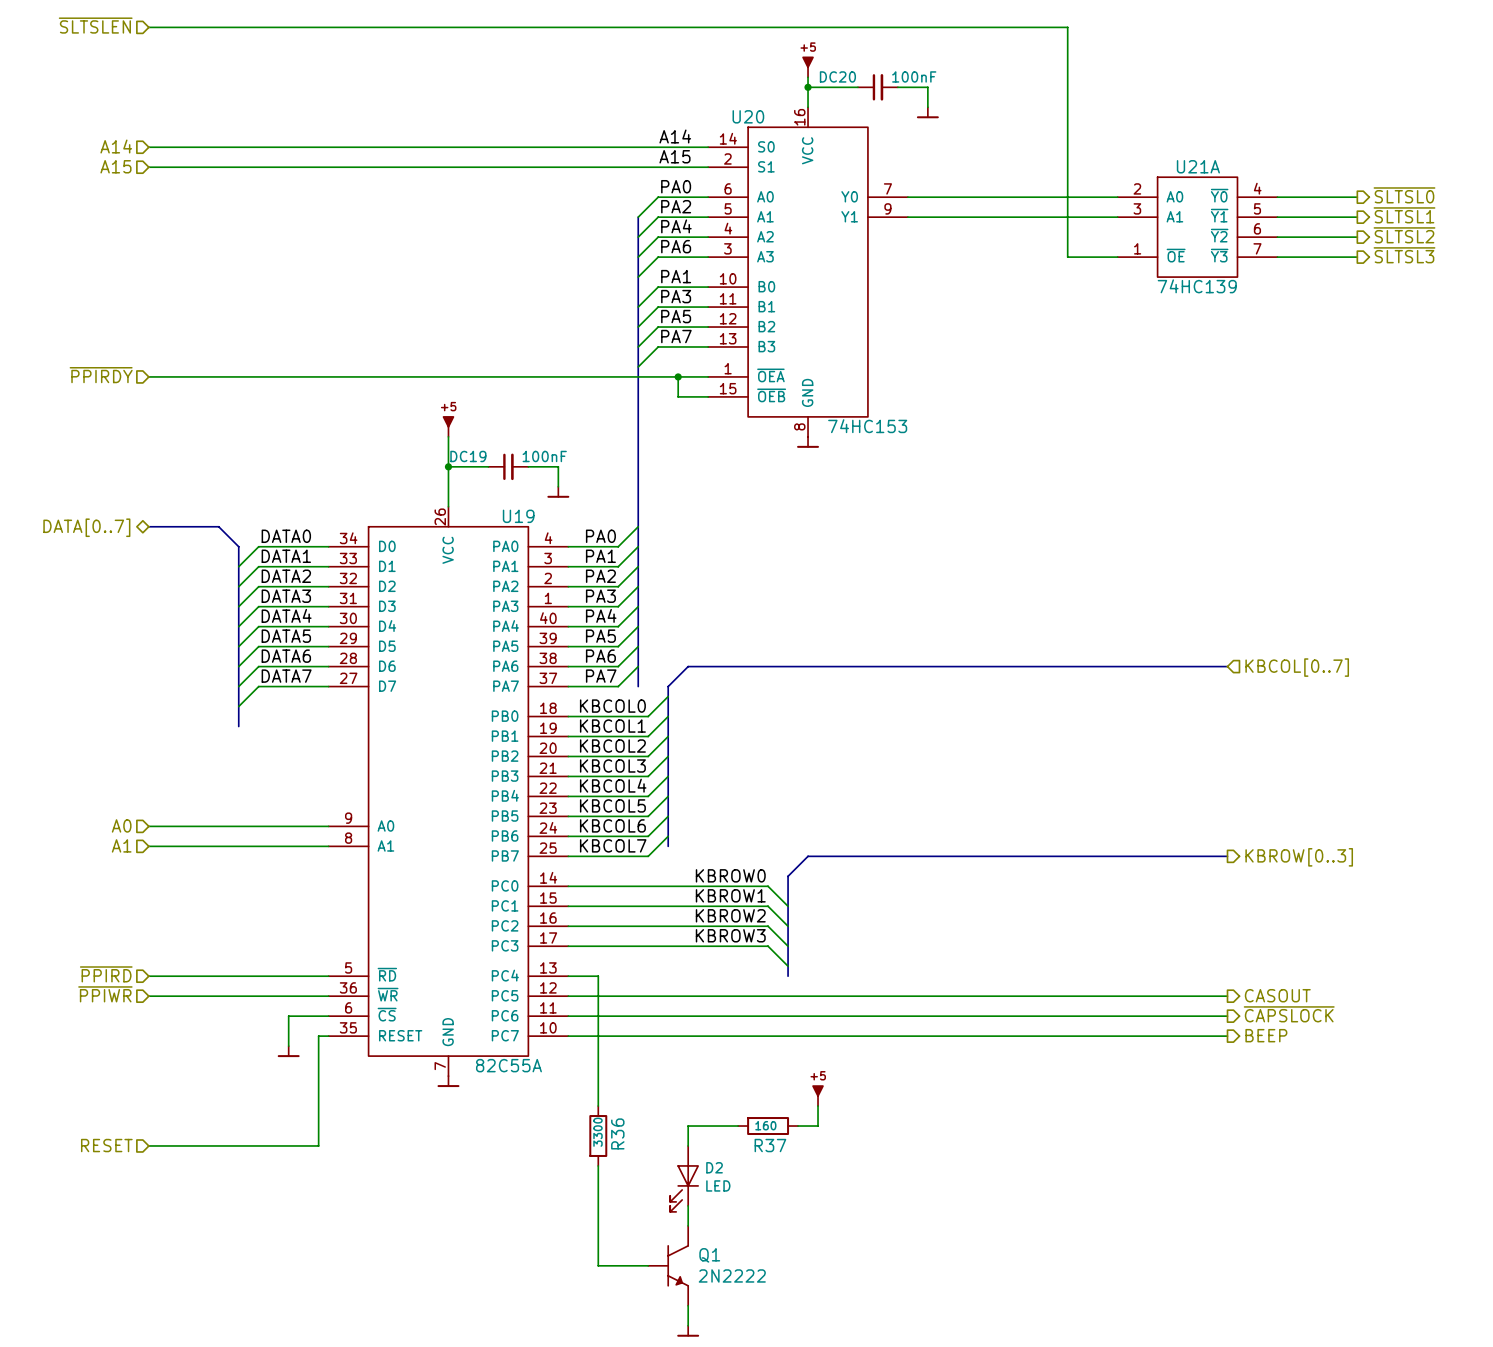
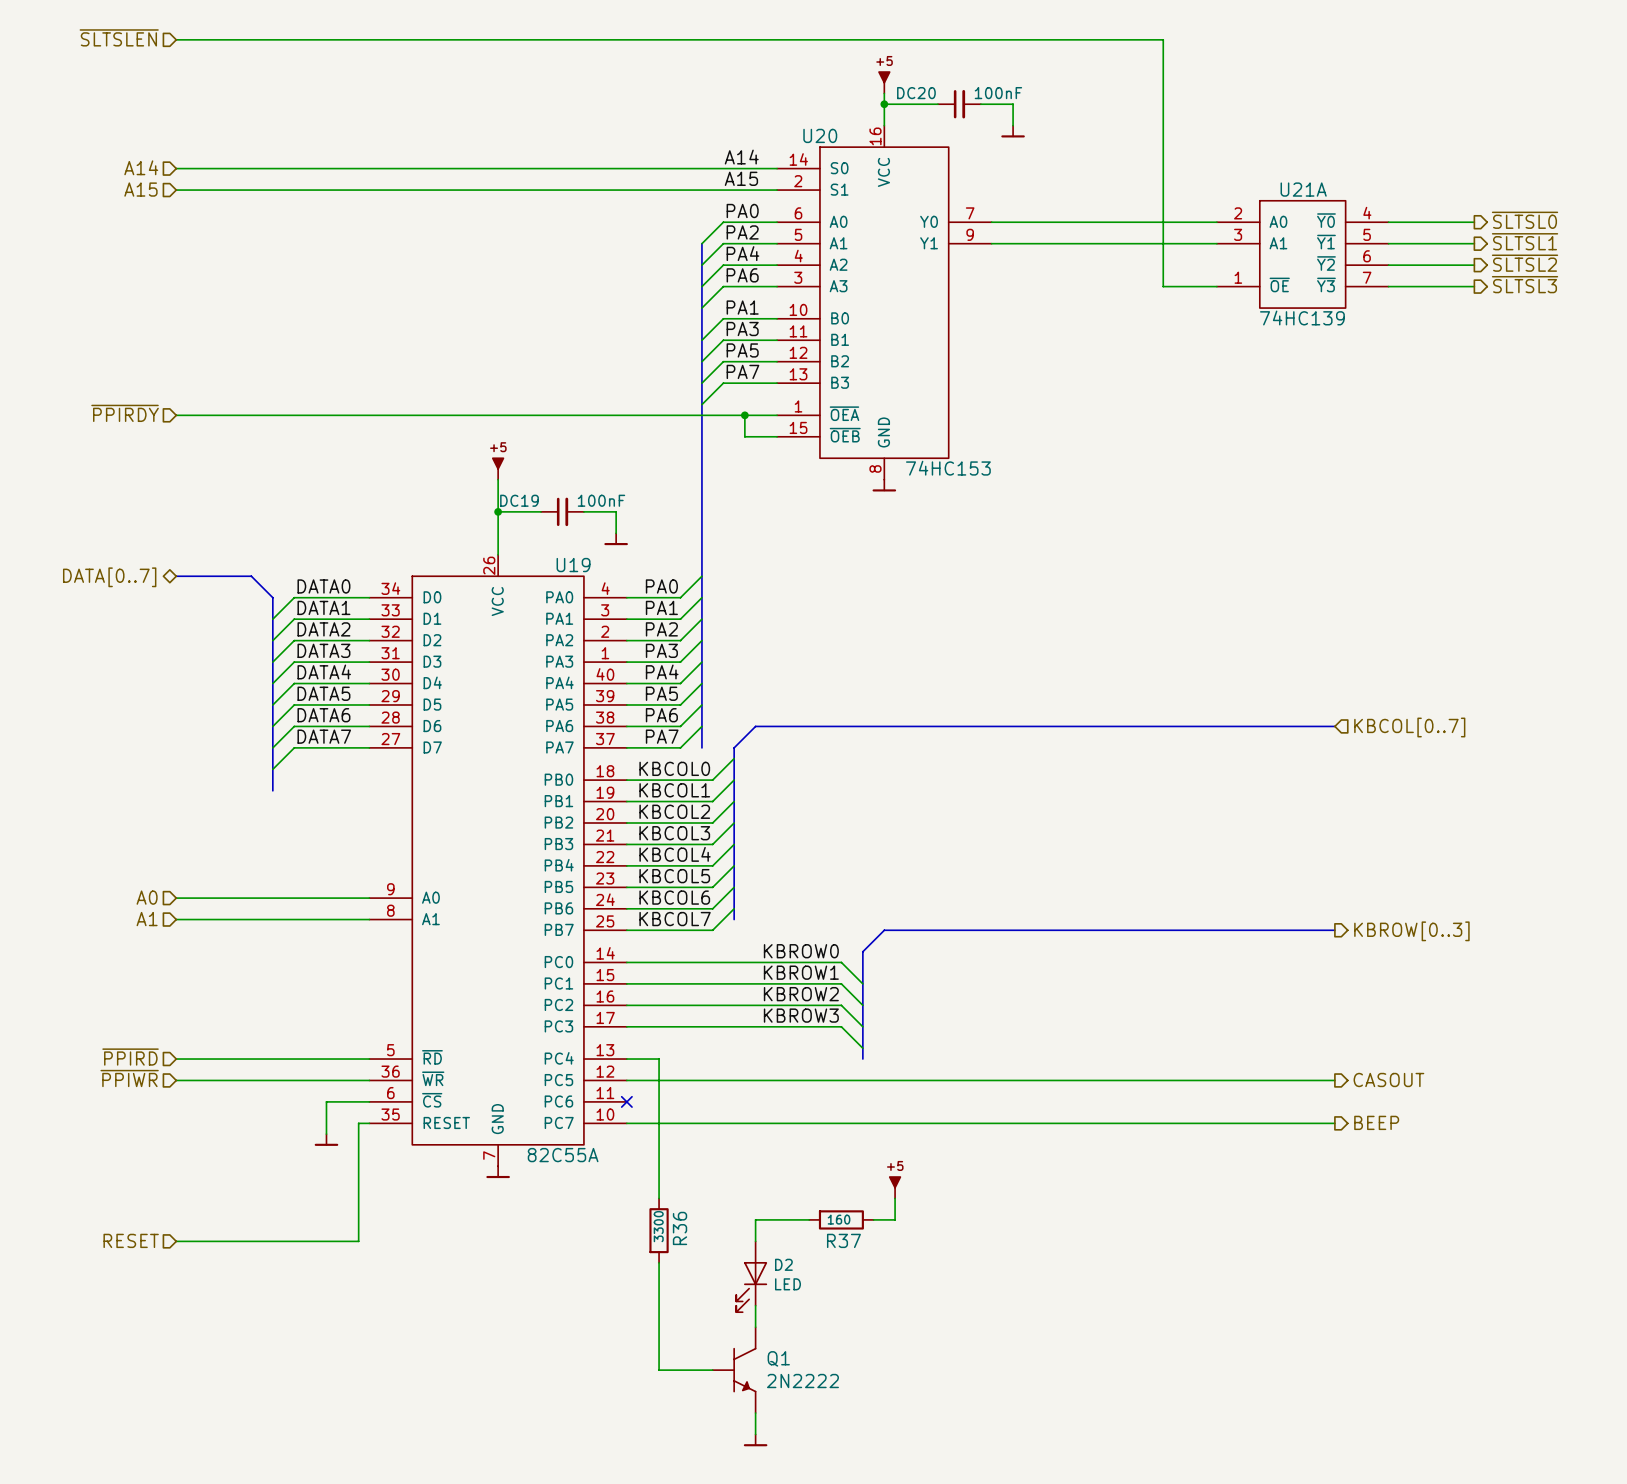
hierarchical label: ~{CAPSLOCK} (1289, 1014) -> none
wire: (568, 1016) (1227, 1016) -> none
no-connect mark: none -> (626, 1101)

